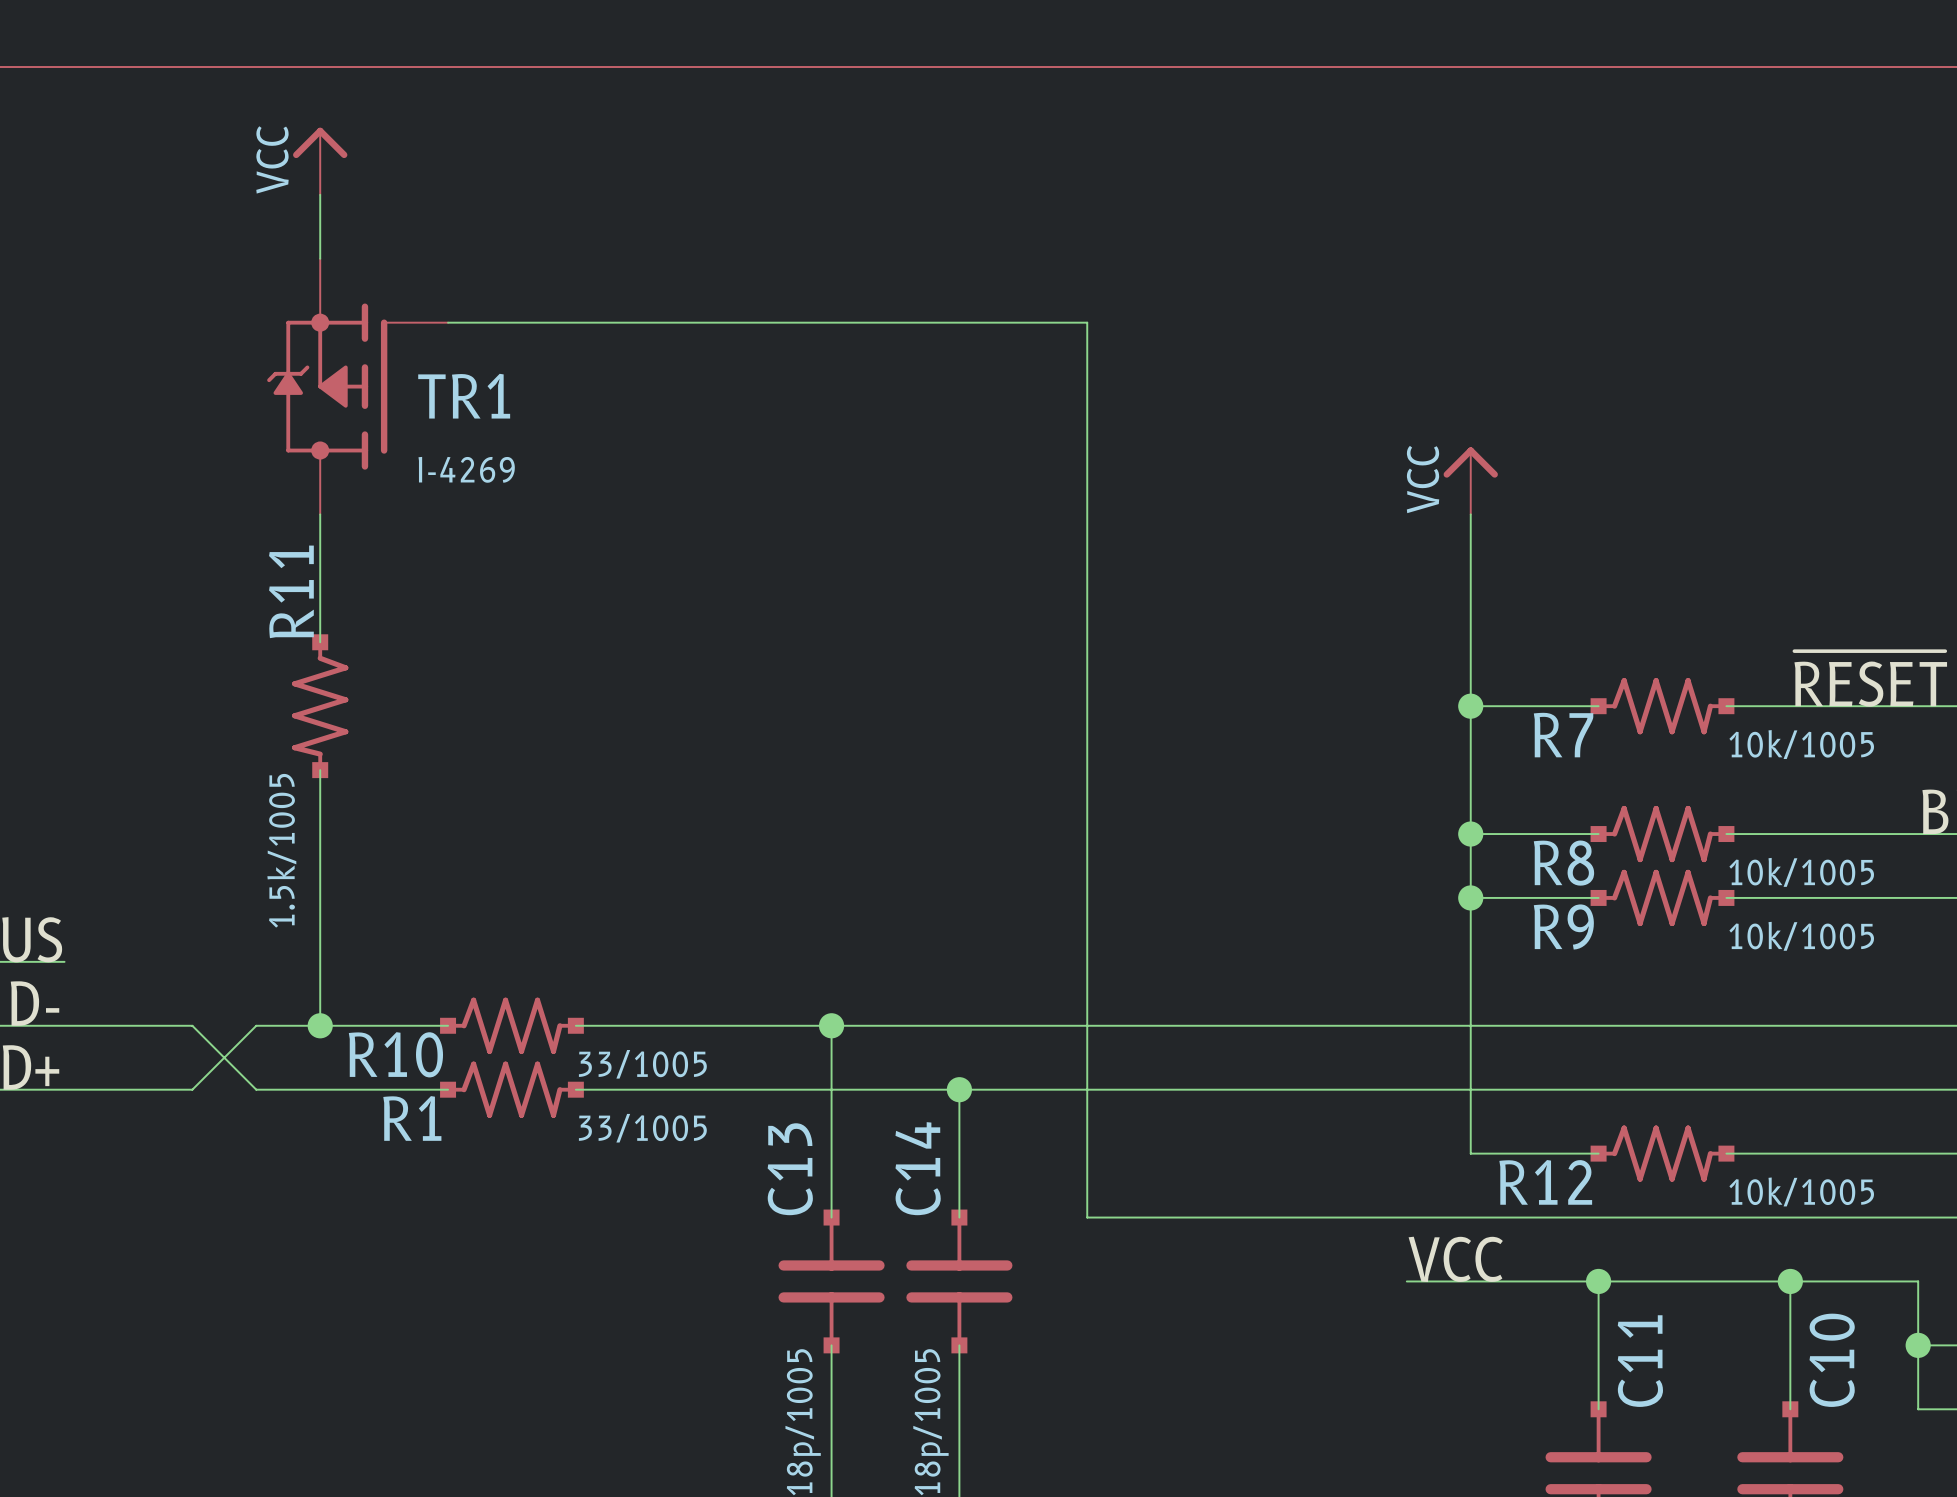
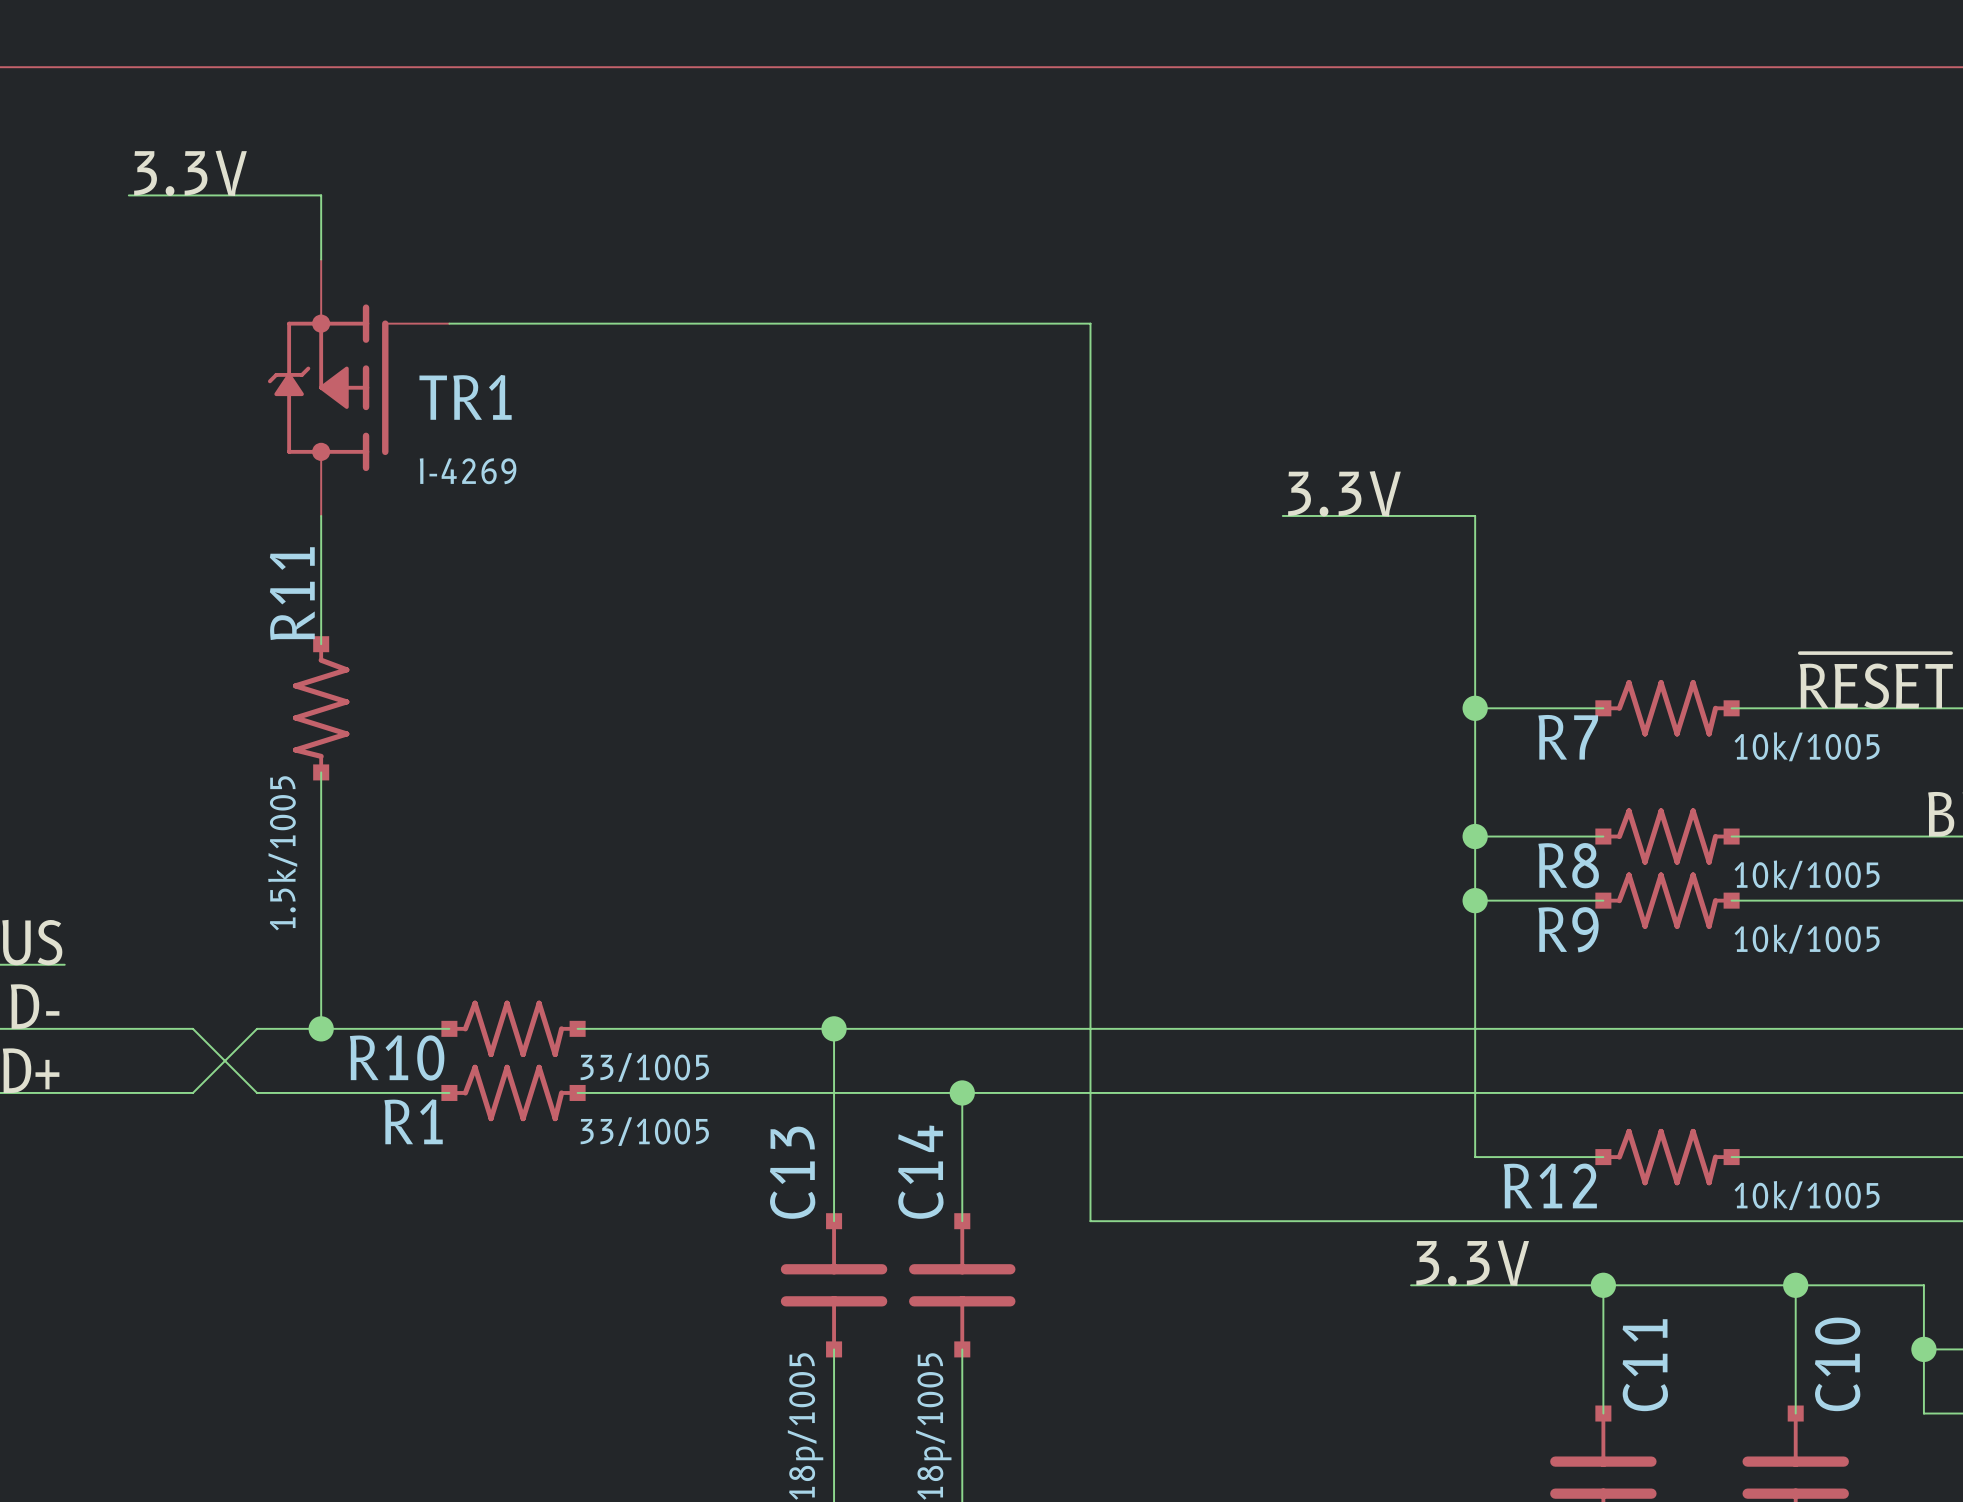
power symbol: VCC (320, 161) -> none
label: none -> 3.3V (190, 173)
wire: none -> (128, 195) (321, 195)
power symbol: VCC (1470, 480) -> none
label: none -> 3.3V (1344, 493)
wire: none -> (1282, 515) (1475, 515)
label: VCC (1455, 1259) -> 3.3V (1472, 1263)

